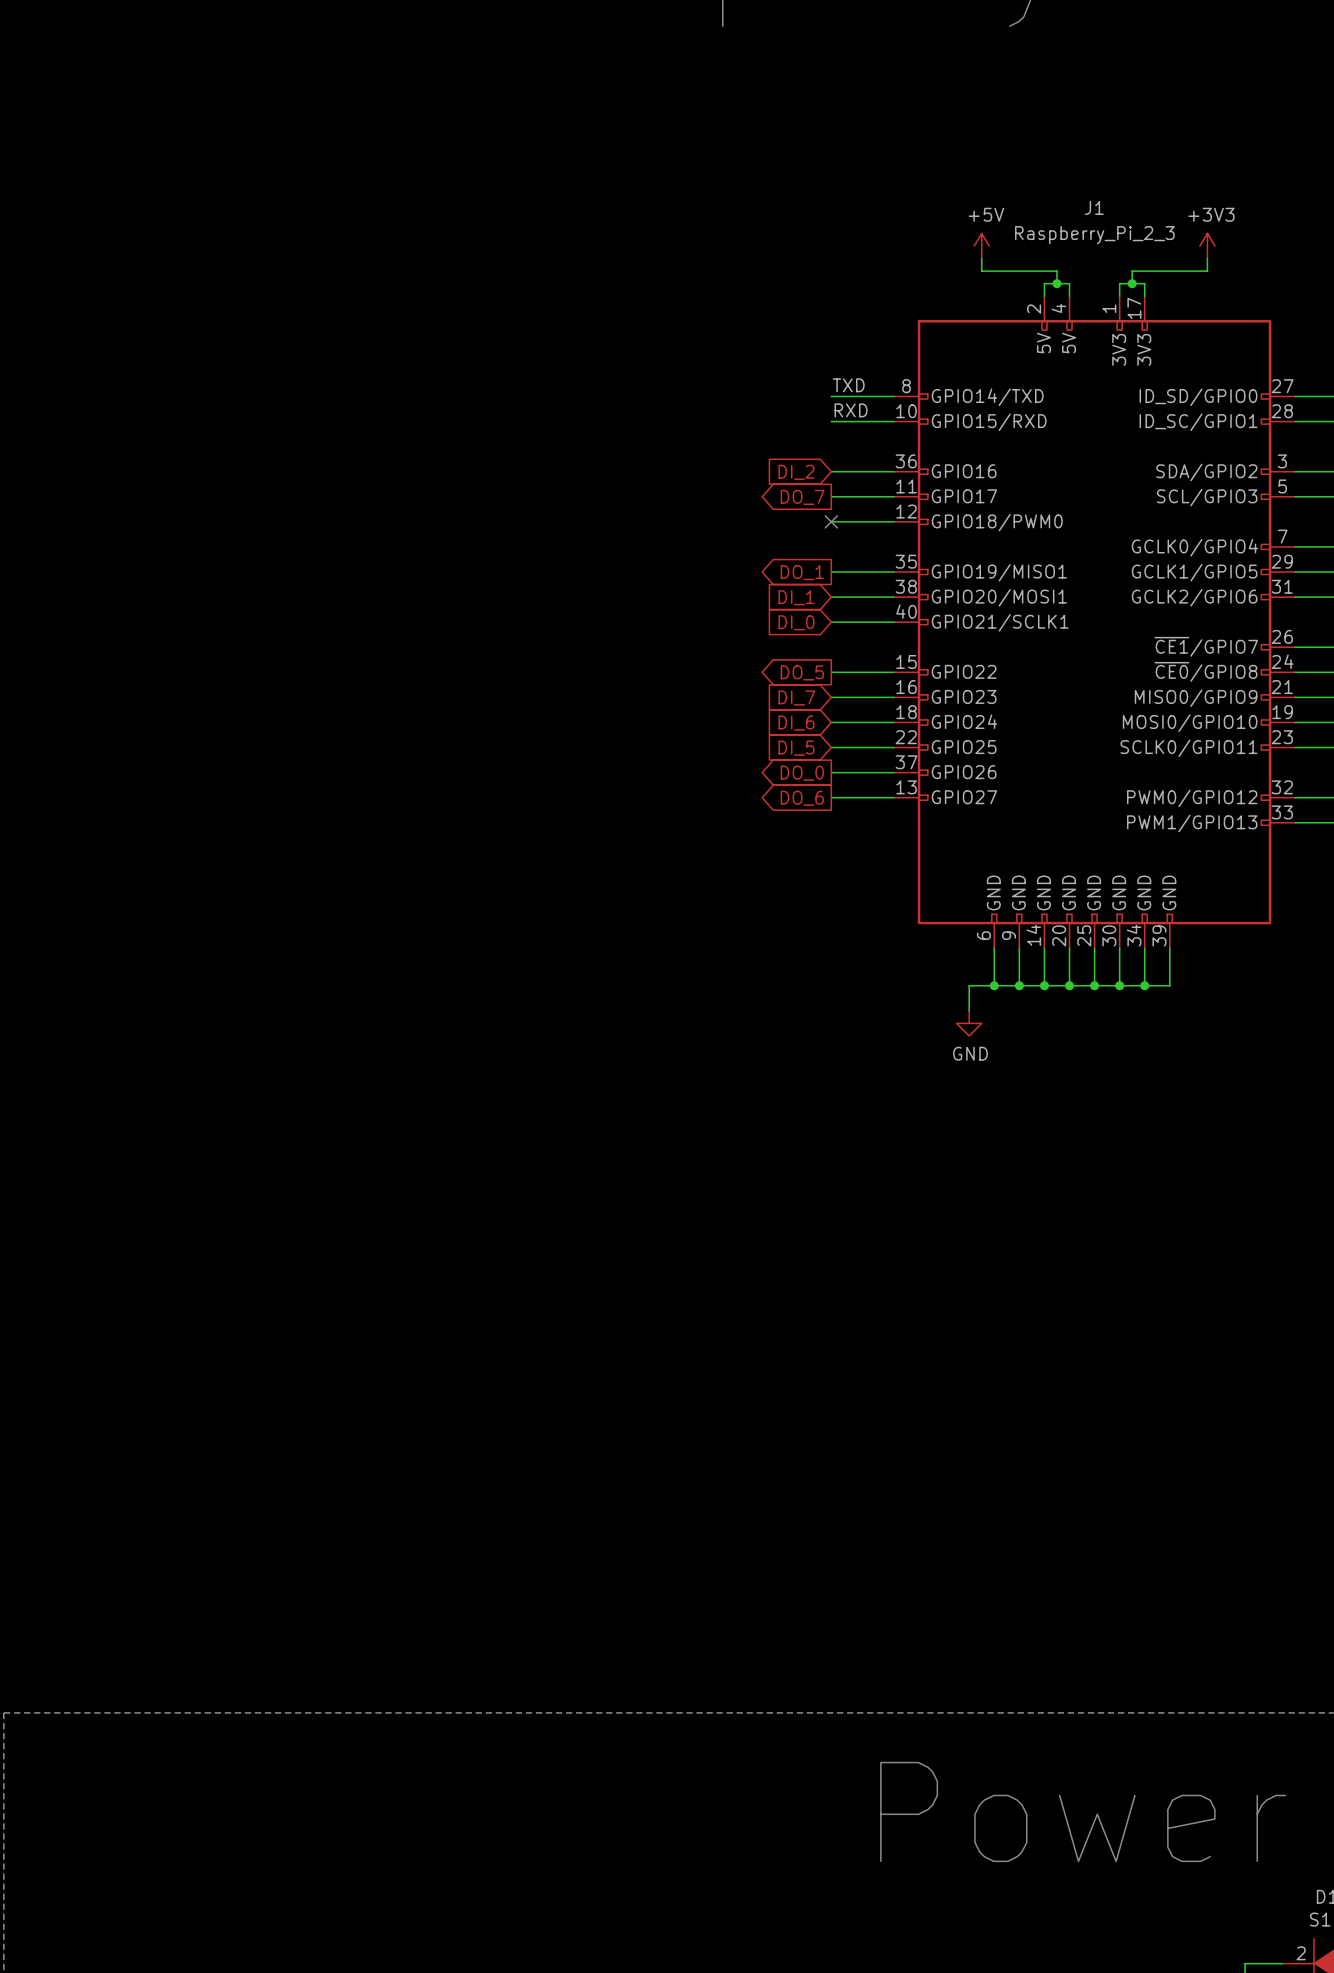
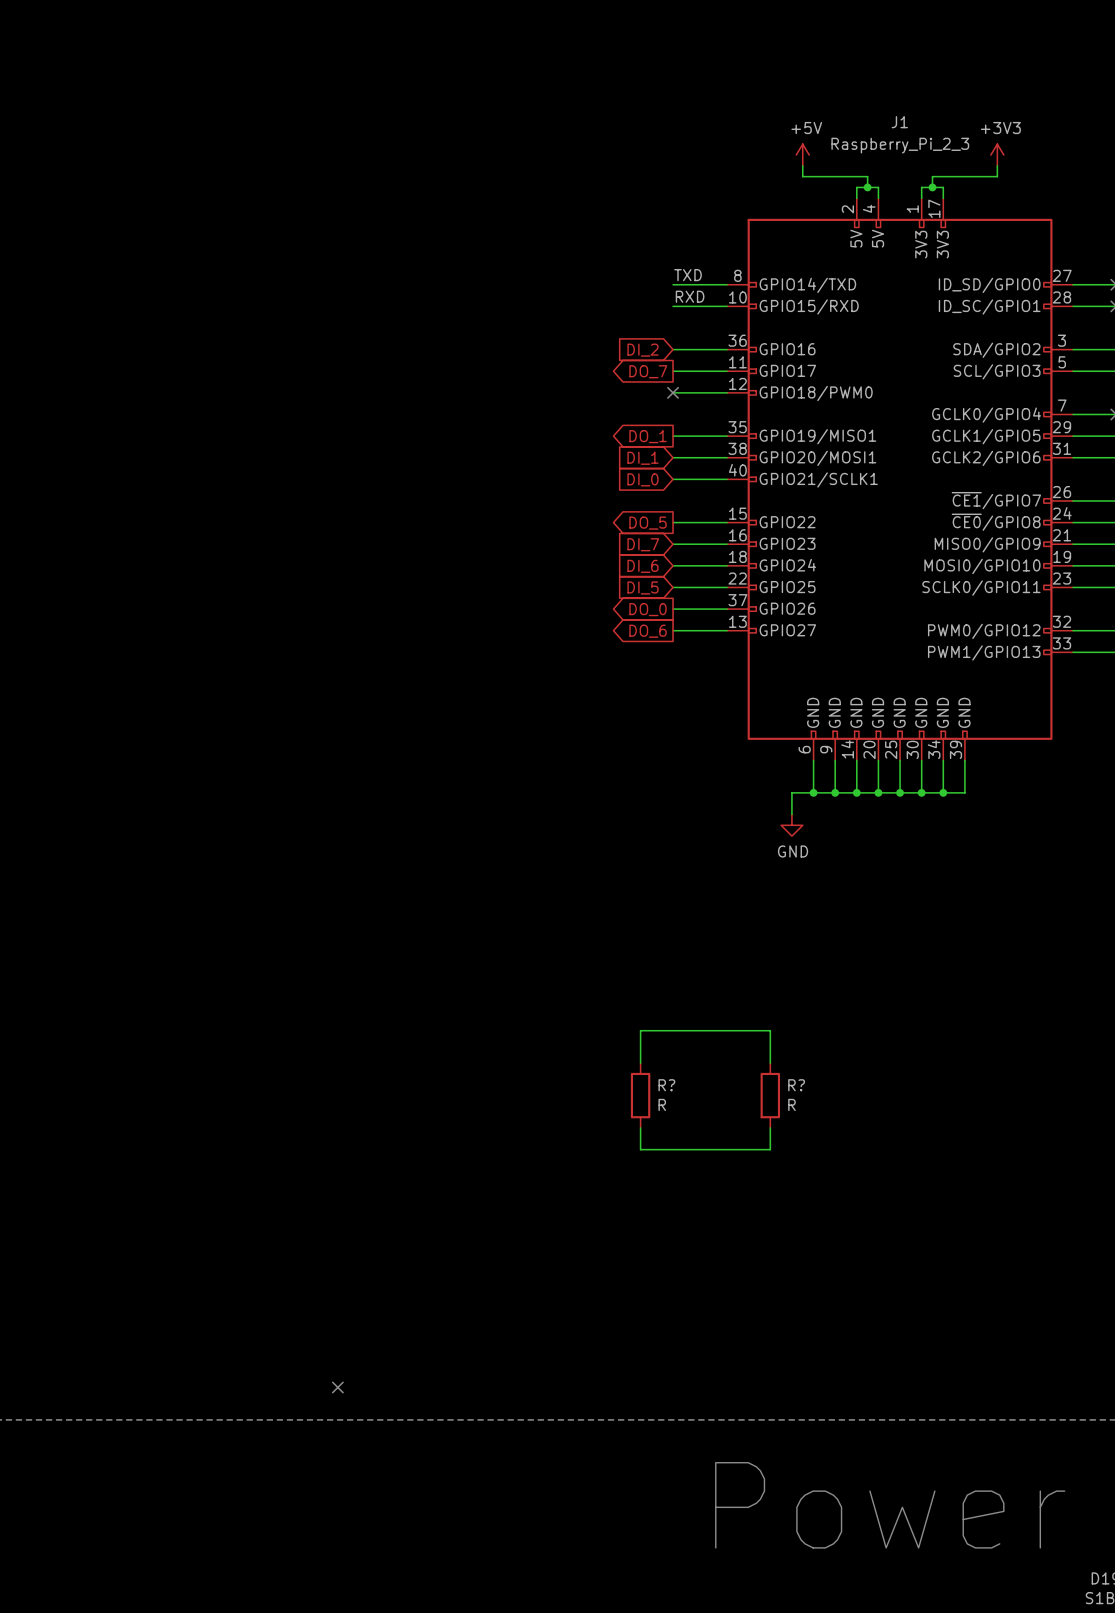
wire: none -> (640, 1063) (640, 1030) (770, 1030) (770, 1063)
R?: none -> R (640, 1095)
R?: none -> R (770, 1095)
wire: none -> (640, 1128) (640, 1149) (770, 1149) (770, 1128)
no-connect mark: none -> (337, 1387)

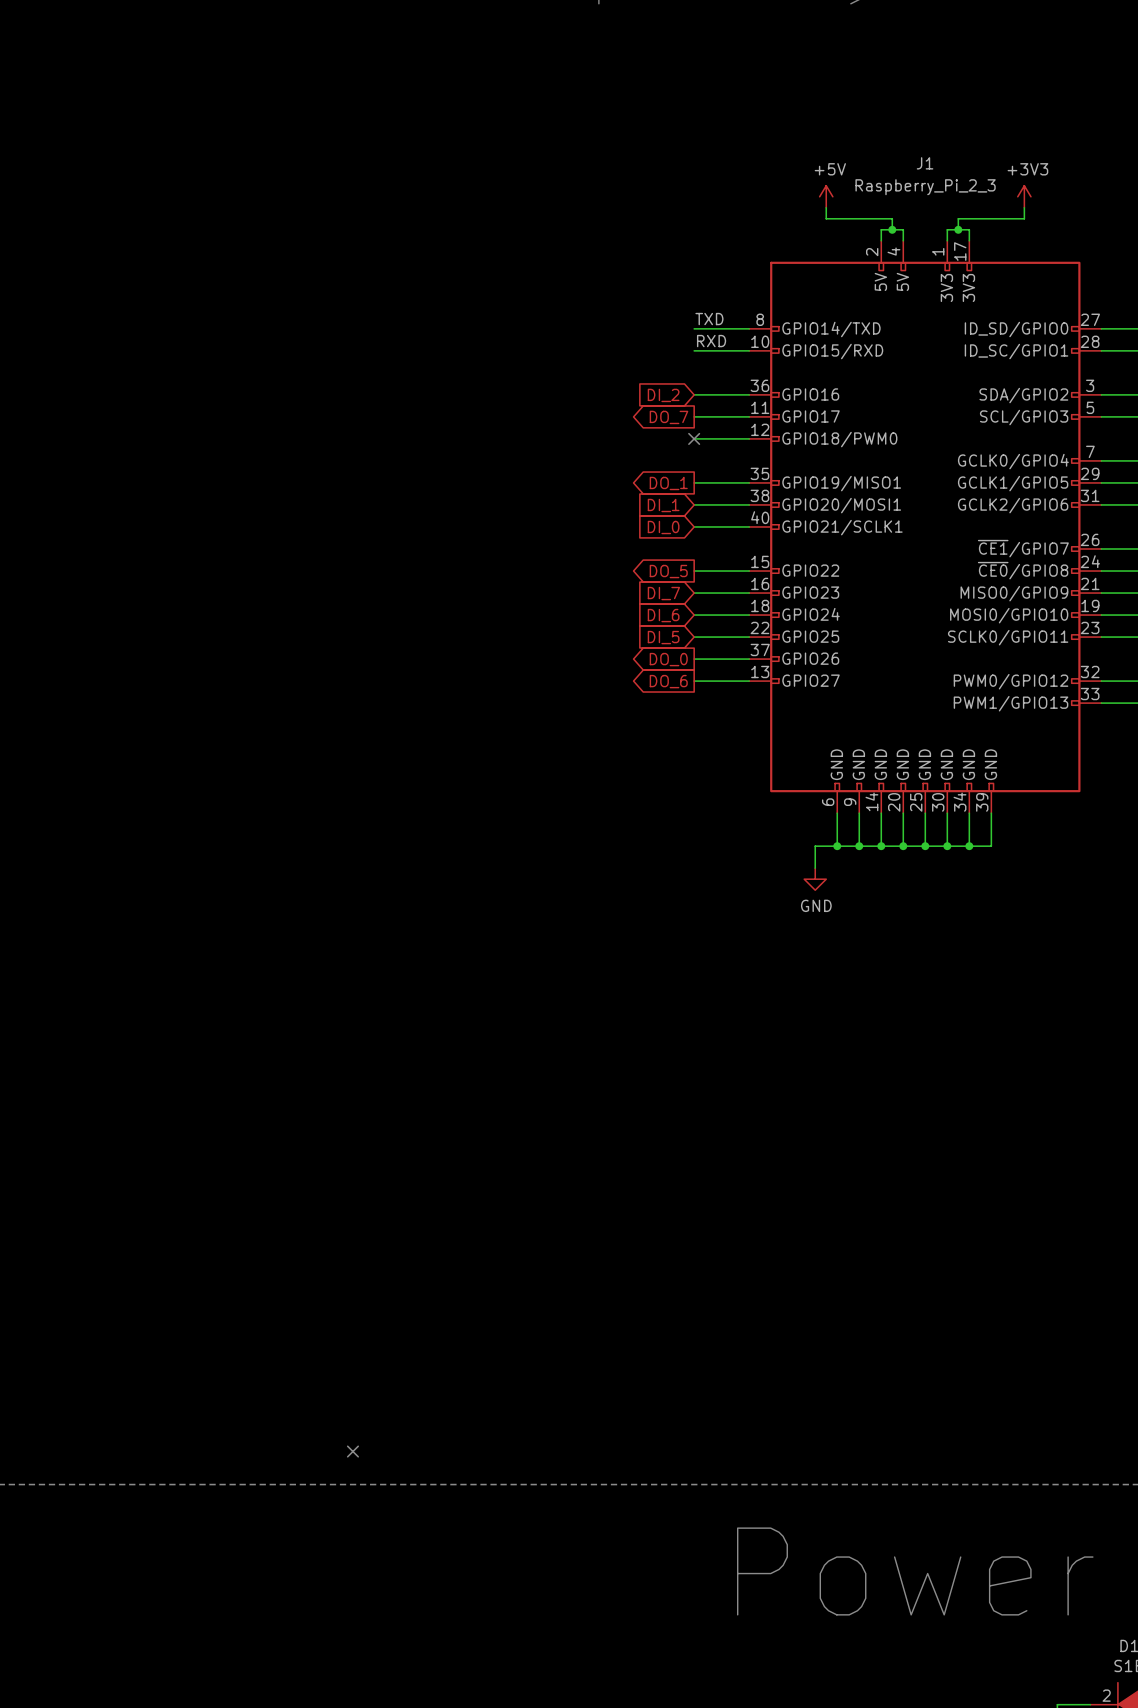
wire: (640, 1063) (640, 1030) (770, 1030) (770, 1063) -> none
R?: R (640, 1095) -> none
R?: R (770, 1095) -> none
wire: (640, 1128) (640, 1149) (770, 1149) (770, 1128) -> none

